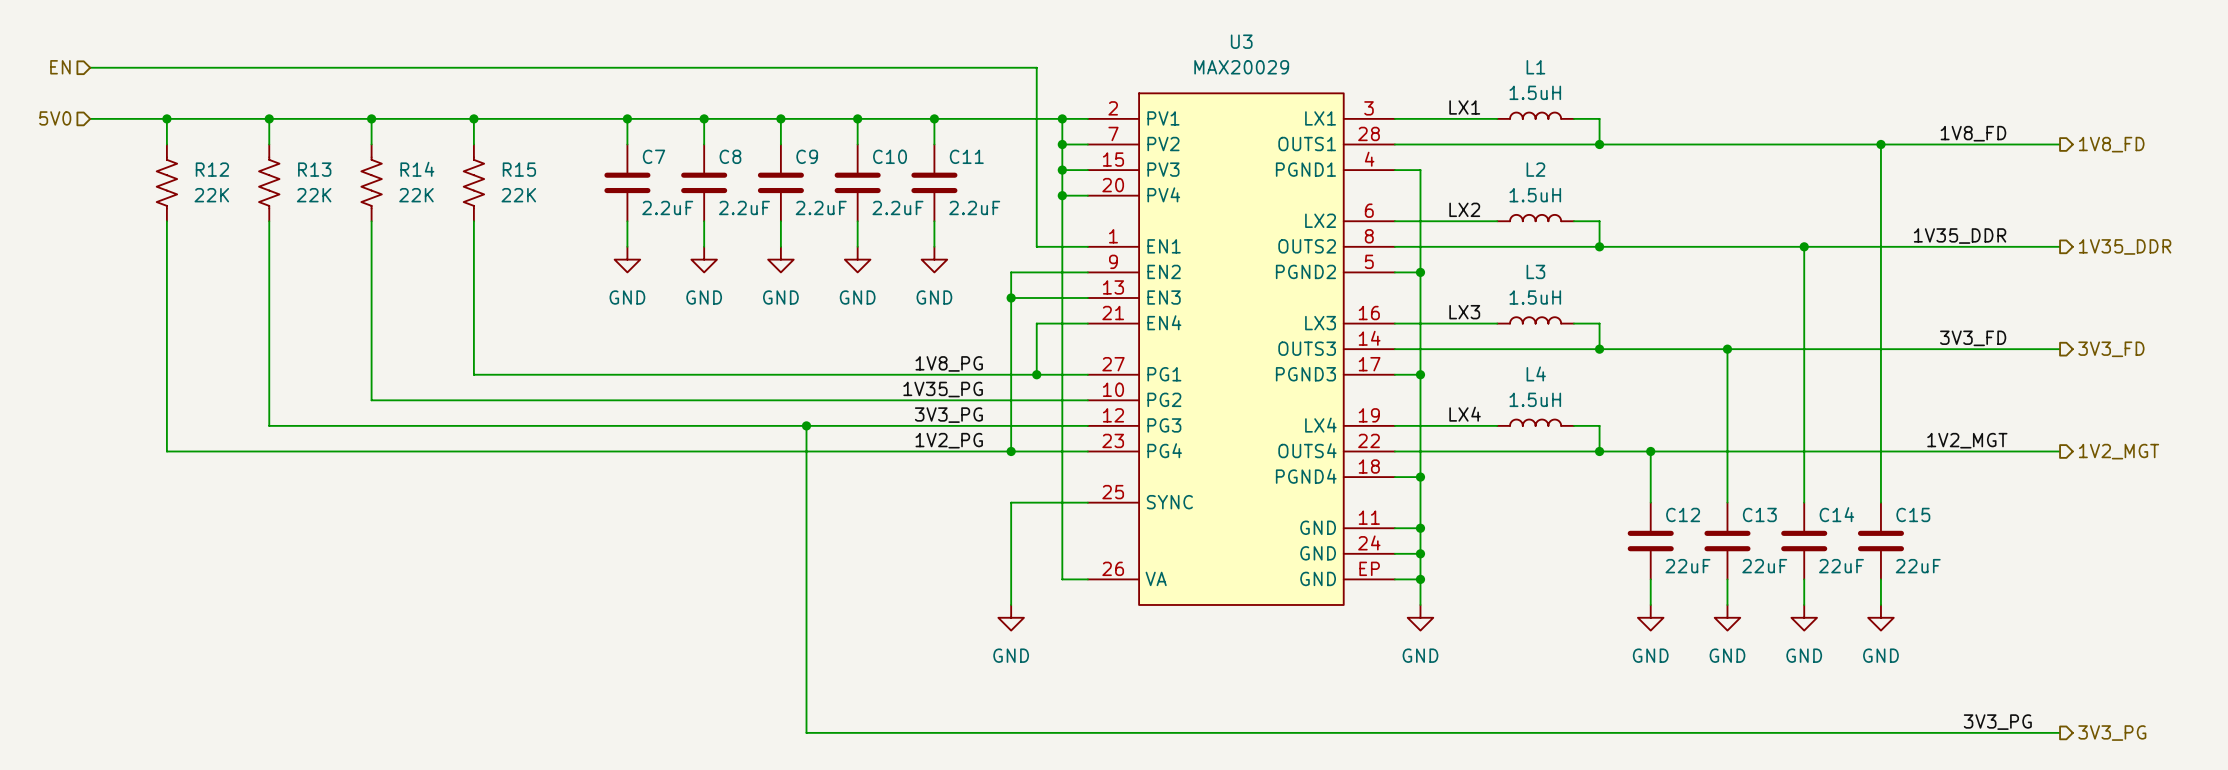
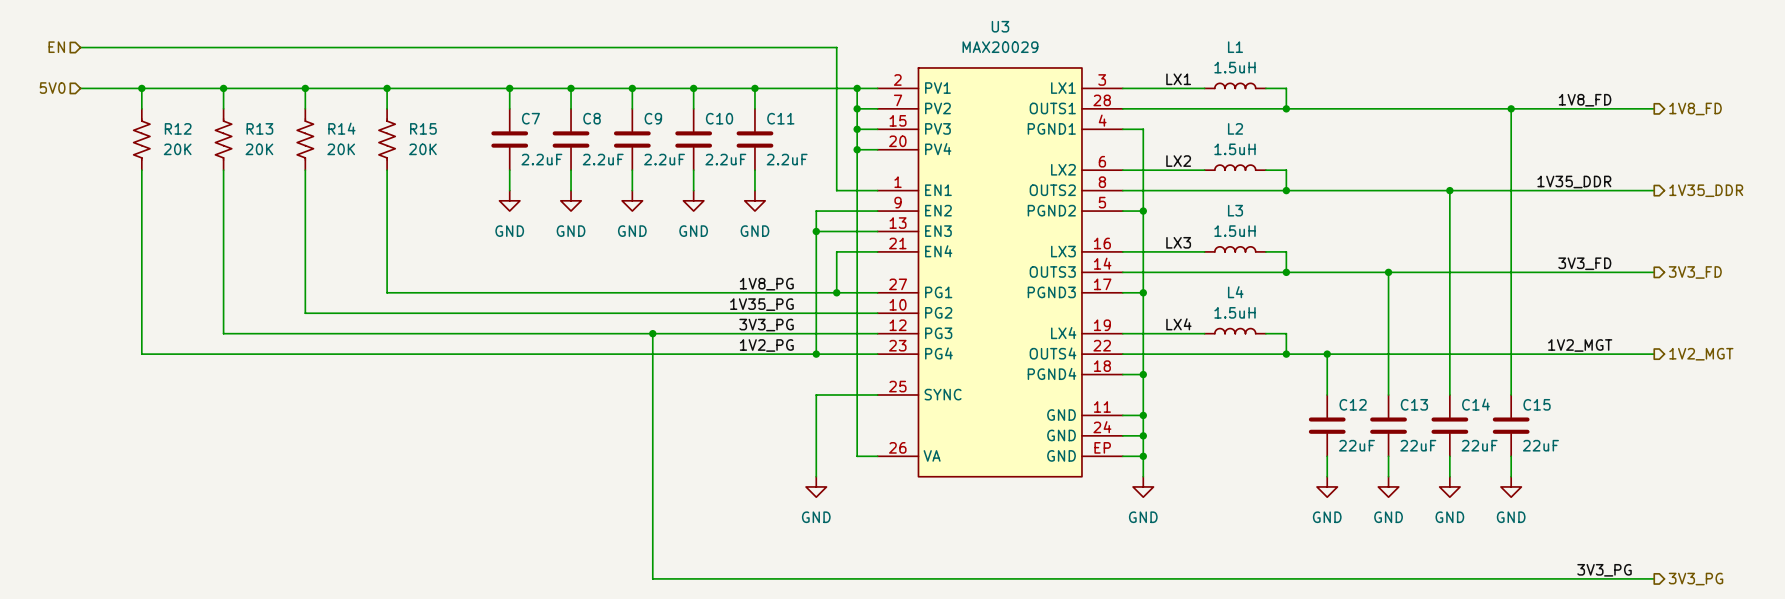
R12 value: 22K (211, 195) -> 20K (177, 149)
R13 value: 22K (314, 195) -> 20K (259, 149)
R14 value: 22K (416, 195) -> 20K (341, 149)
R15 value: 22K (518, 195) -> 20K (422, 149)

